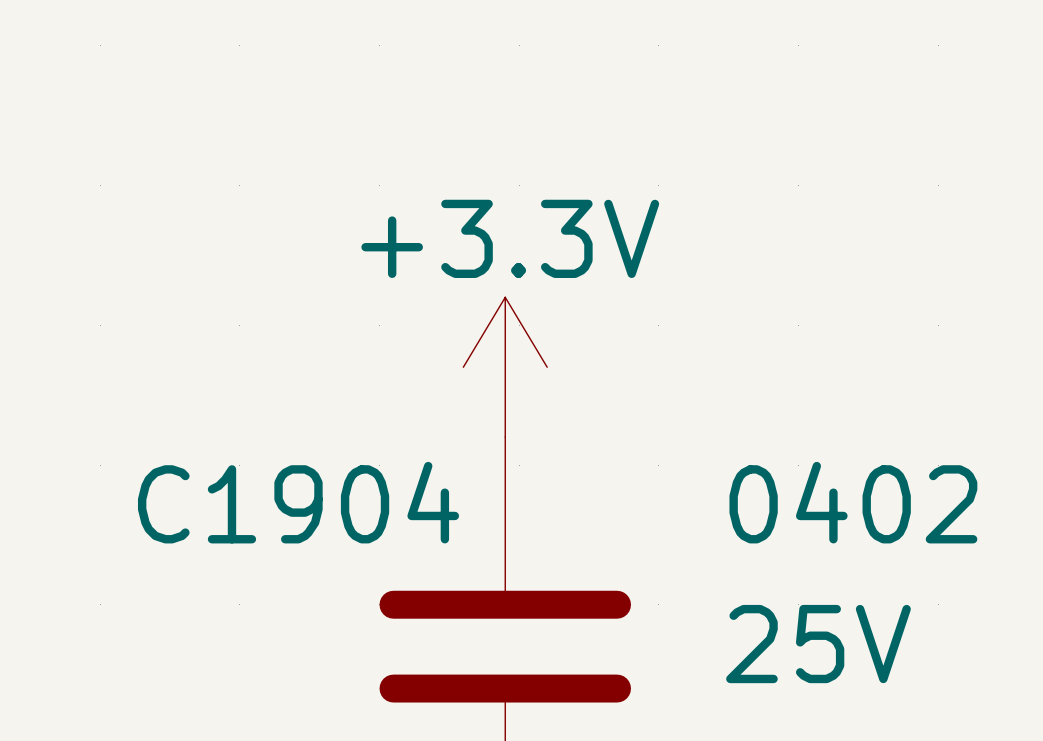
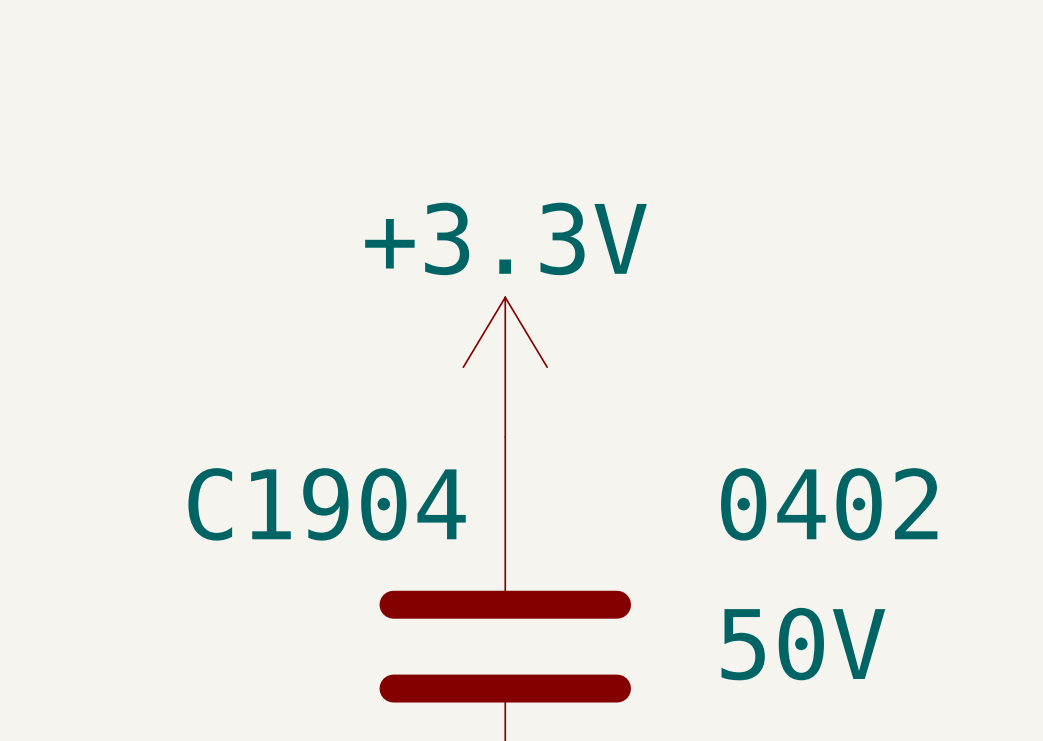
C1904 text: 25V (818, 644) -> 50V (803, 644)

